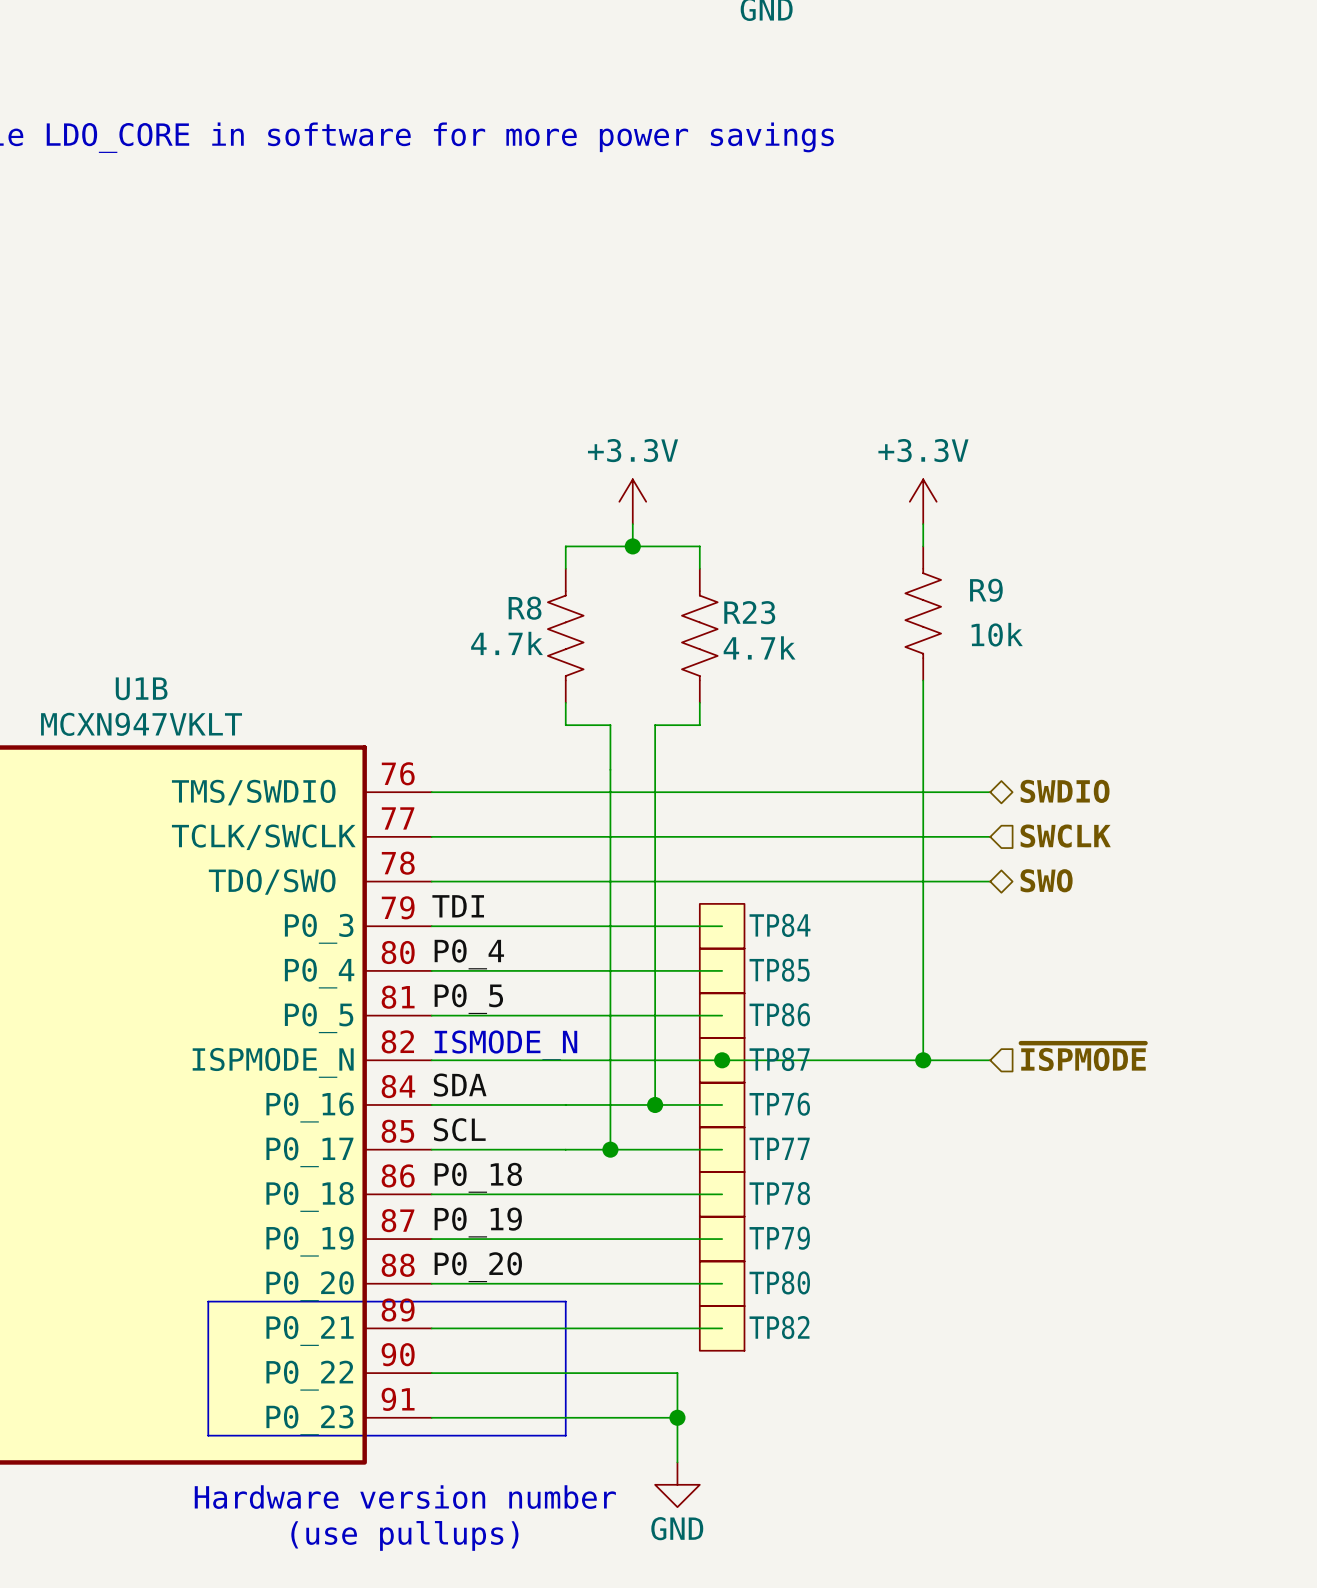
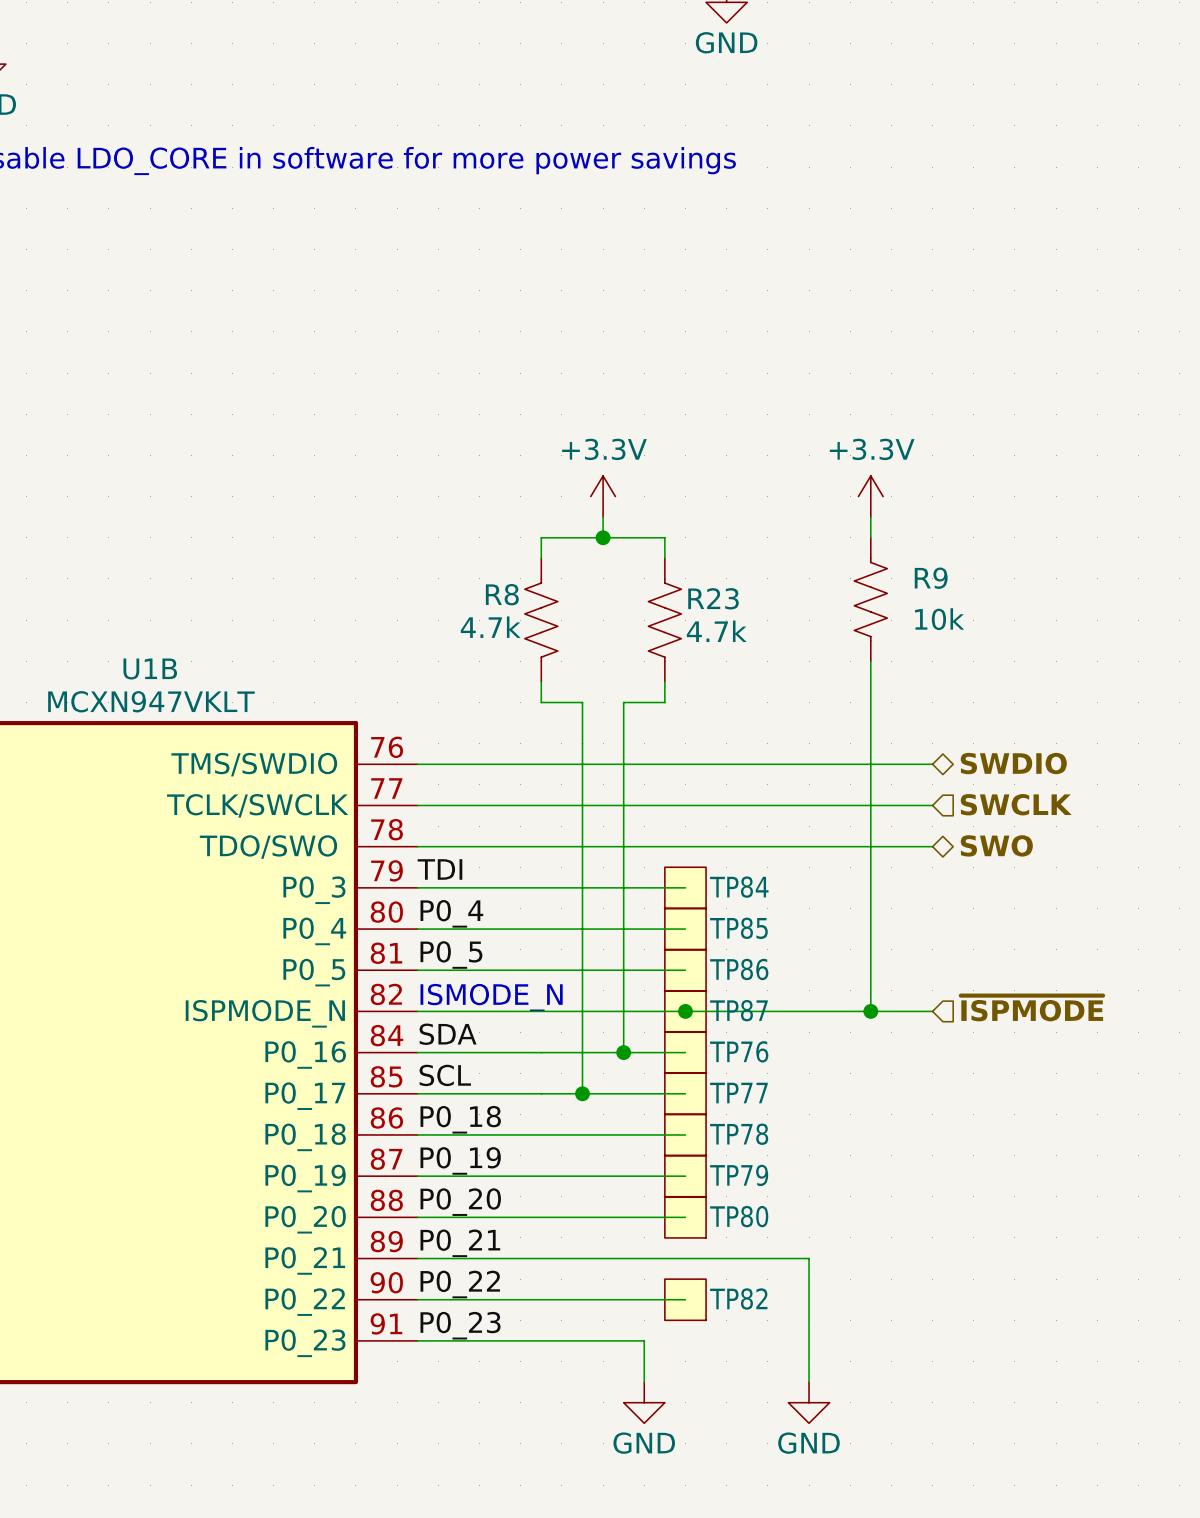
line: (208, 1301) (565, 1301) (565, 1435) (208, 1435) (208, 1301) -> none
label: none -> P0_21 (460, 1243)
wire: none -> (685, 1258) (809, 1258) (809, 1382)
TP82 position: (722, 1328) -> (685, 1299)
label: none -> P0_22 (460, 1284)
wire: (677, 1373) (677, 1417) -> (644, 1299) (685, 1299)
label: none -> P0_23 (460, 1325)
junction: (677, 1417) -> none
power symbol: none -> GND (809, 1402)
text: Hardware version number (405, 1497) -> none
text: (use pullups) (404, 1535) -> none

